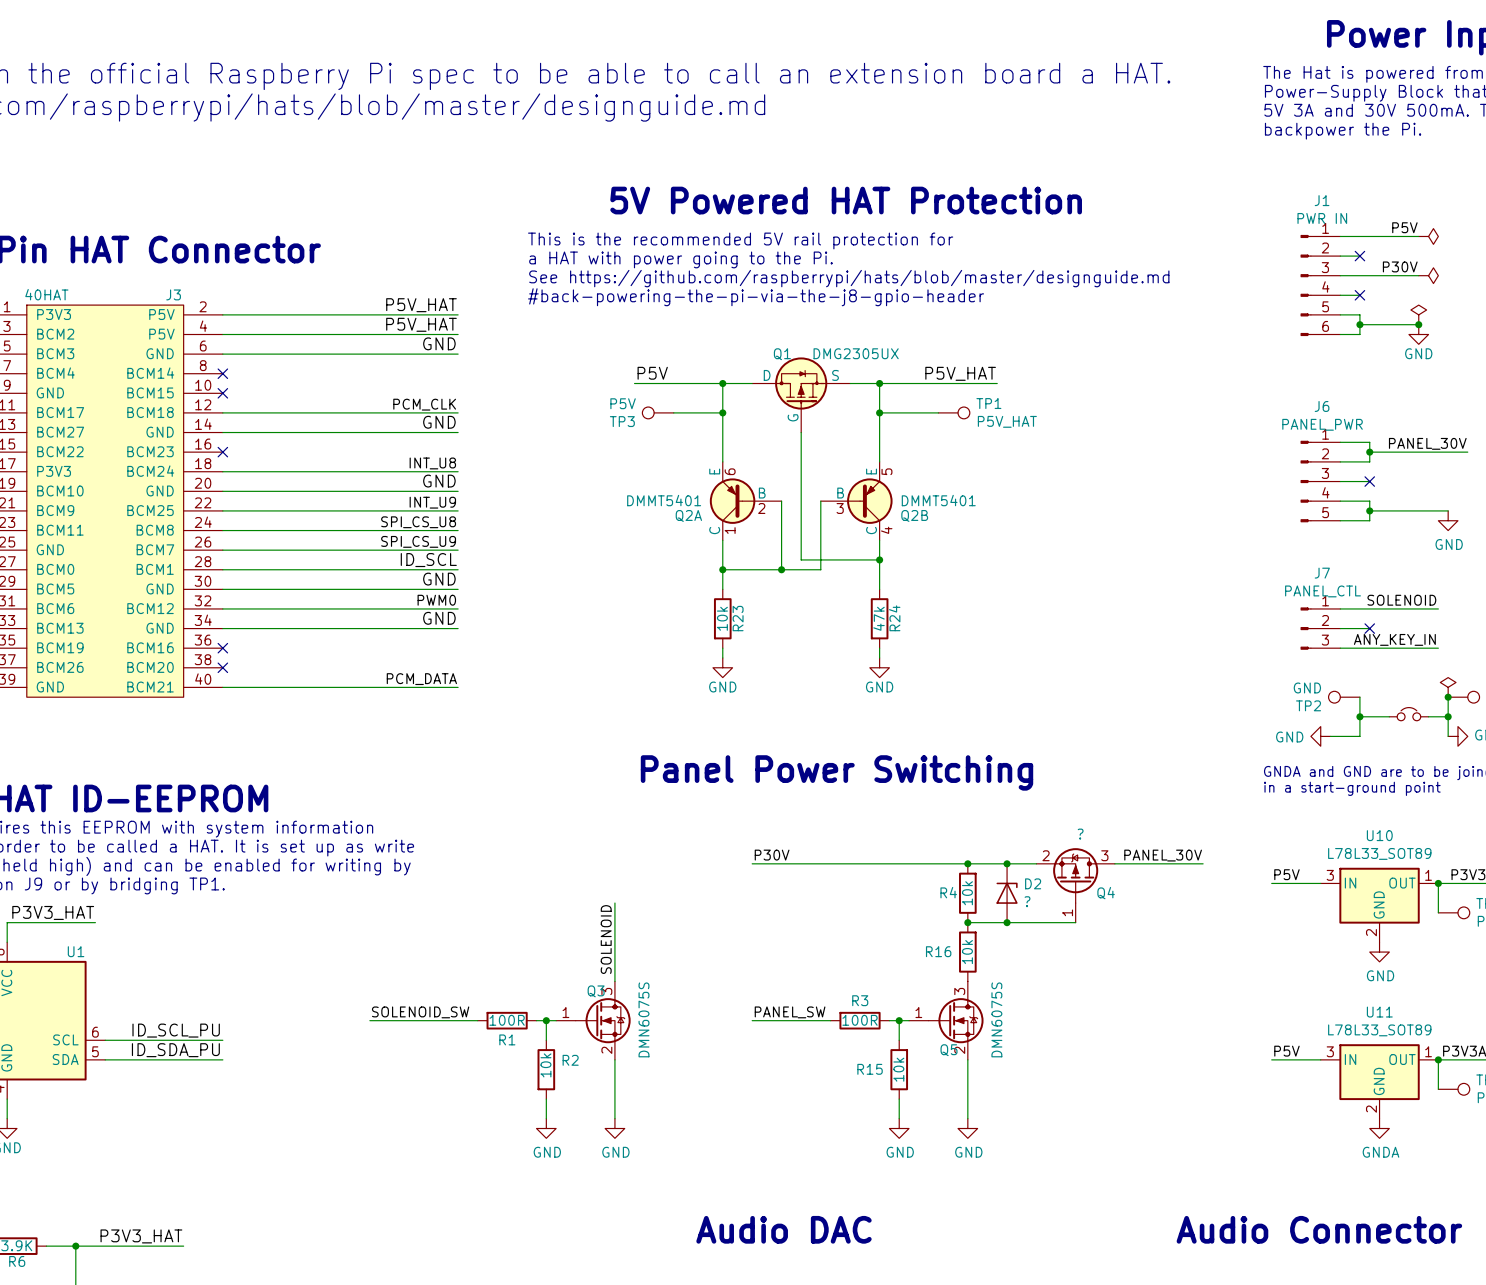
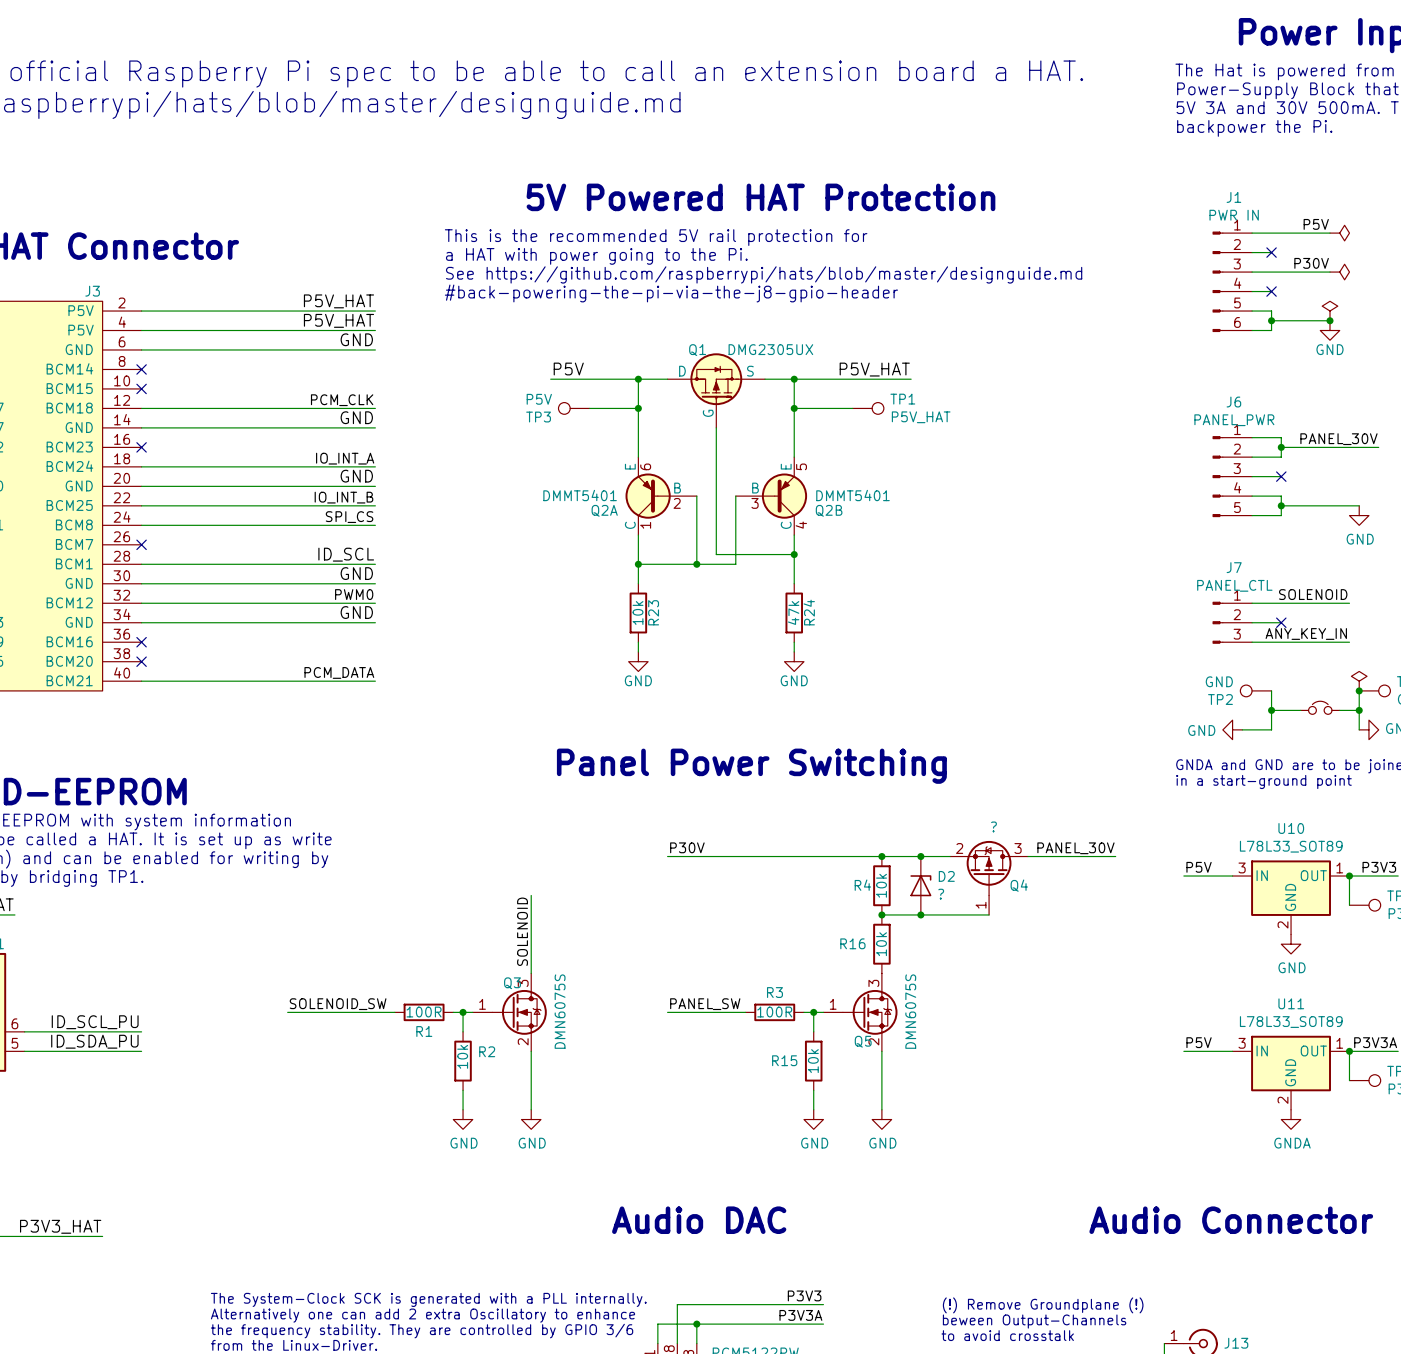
label: INT_U8 (432, 463) -> IO_INT_A (345, 458)
label: INT_U9 (432, 502) -> IO_INT_B (343, 497)
label: SPI_CS_U8 (418, 522) -> SPI_CS (349, 517)
label: SPI_CS_U9 (418, 541) -> none
wire: (222, 550) (458, 550) -> none
no-connect mark: none -> (141, 544)

